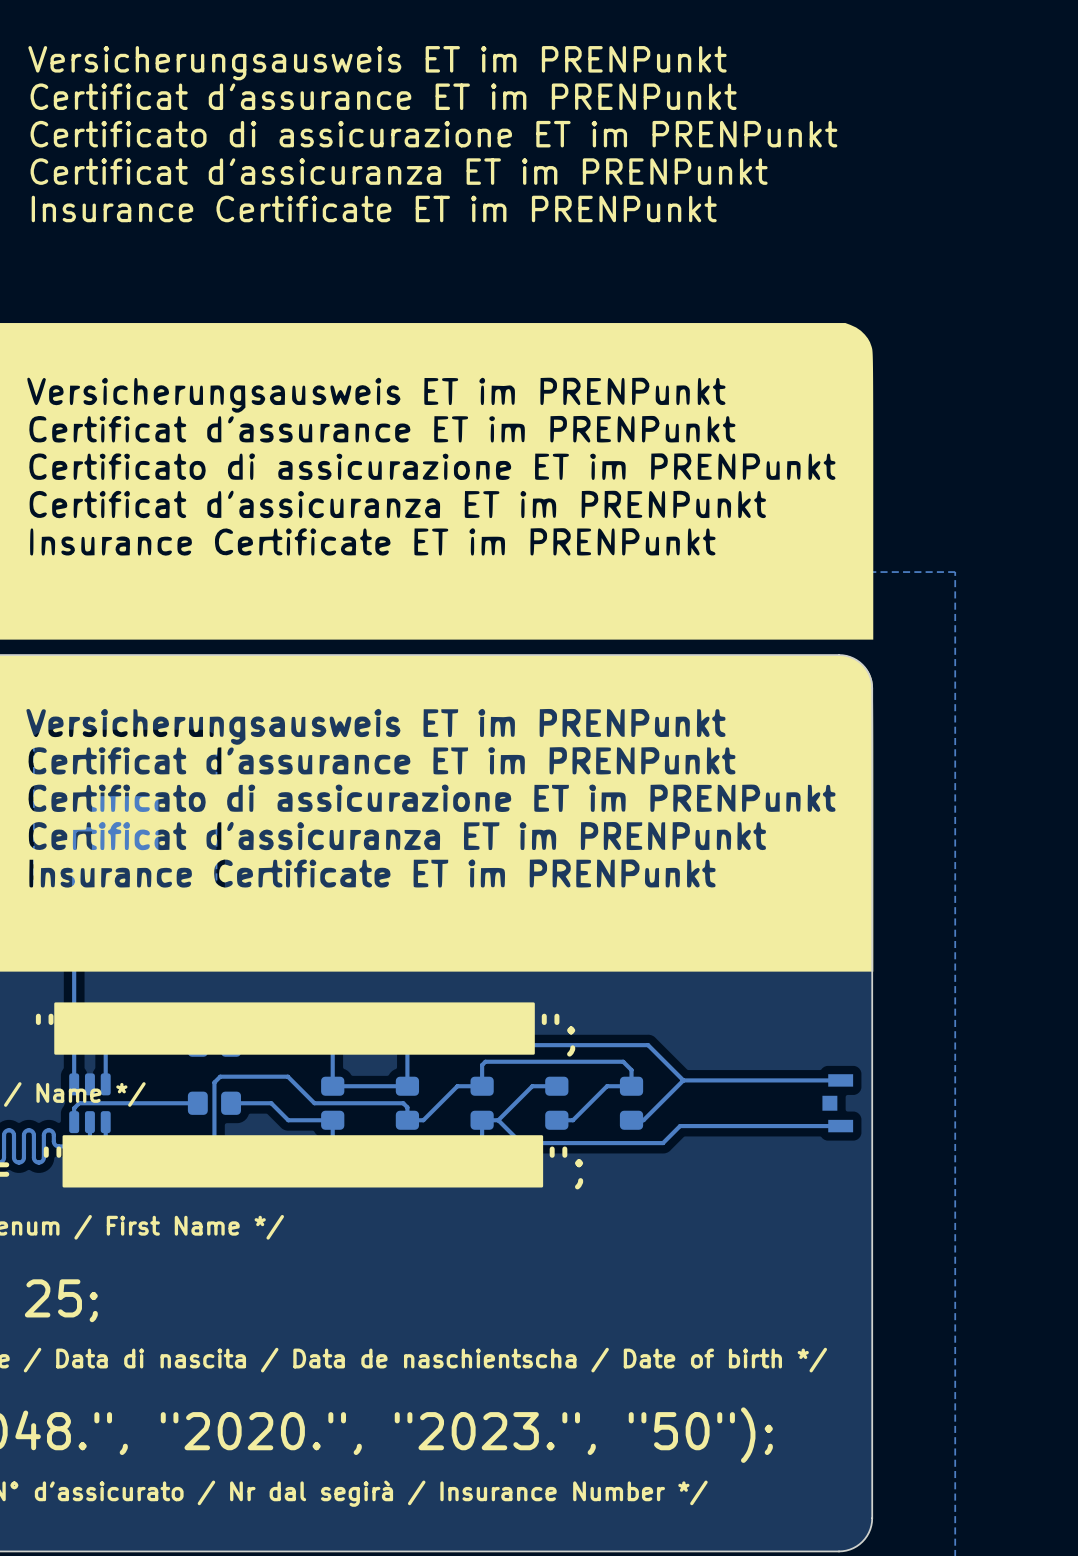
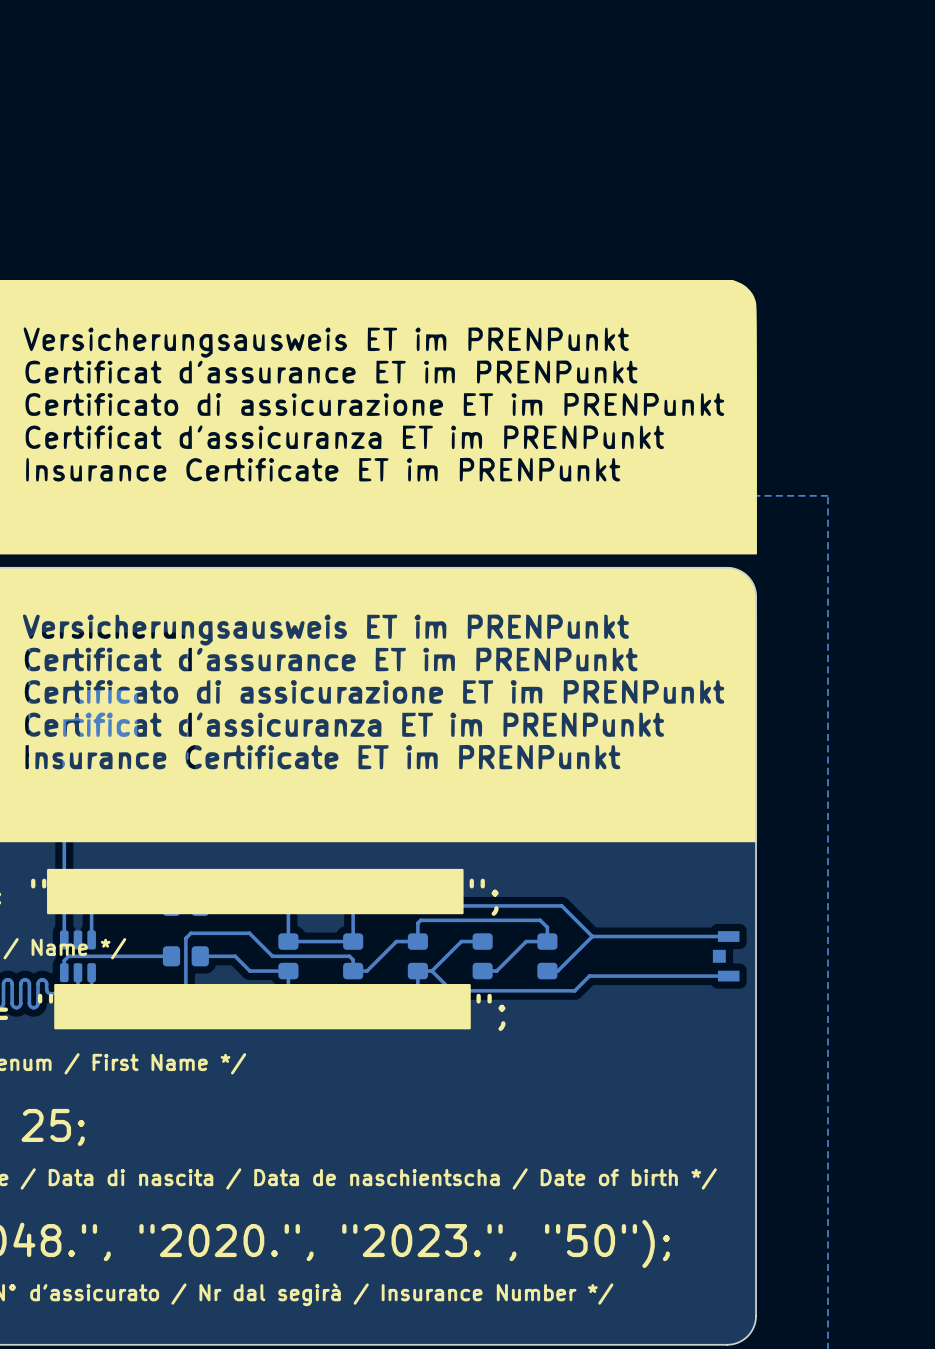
text: Versicherungsausweis ET im PRENPunkt (377, 63) -> none
text: Certificat d'assurance ET im PRENPunkt (383, 96) -> none
text: Certificato di assicurazione ET im PRENPunkt (433, 134) -> none
text: Certificat d'assicuranza ET im PRENPunkt (399, 171) -> none
text: Insurance Certificate ET im PRENPunkt (374, 208) -> none

